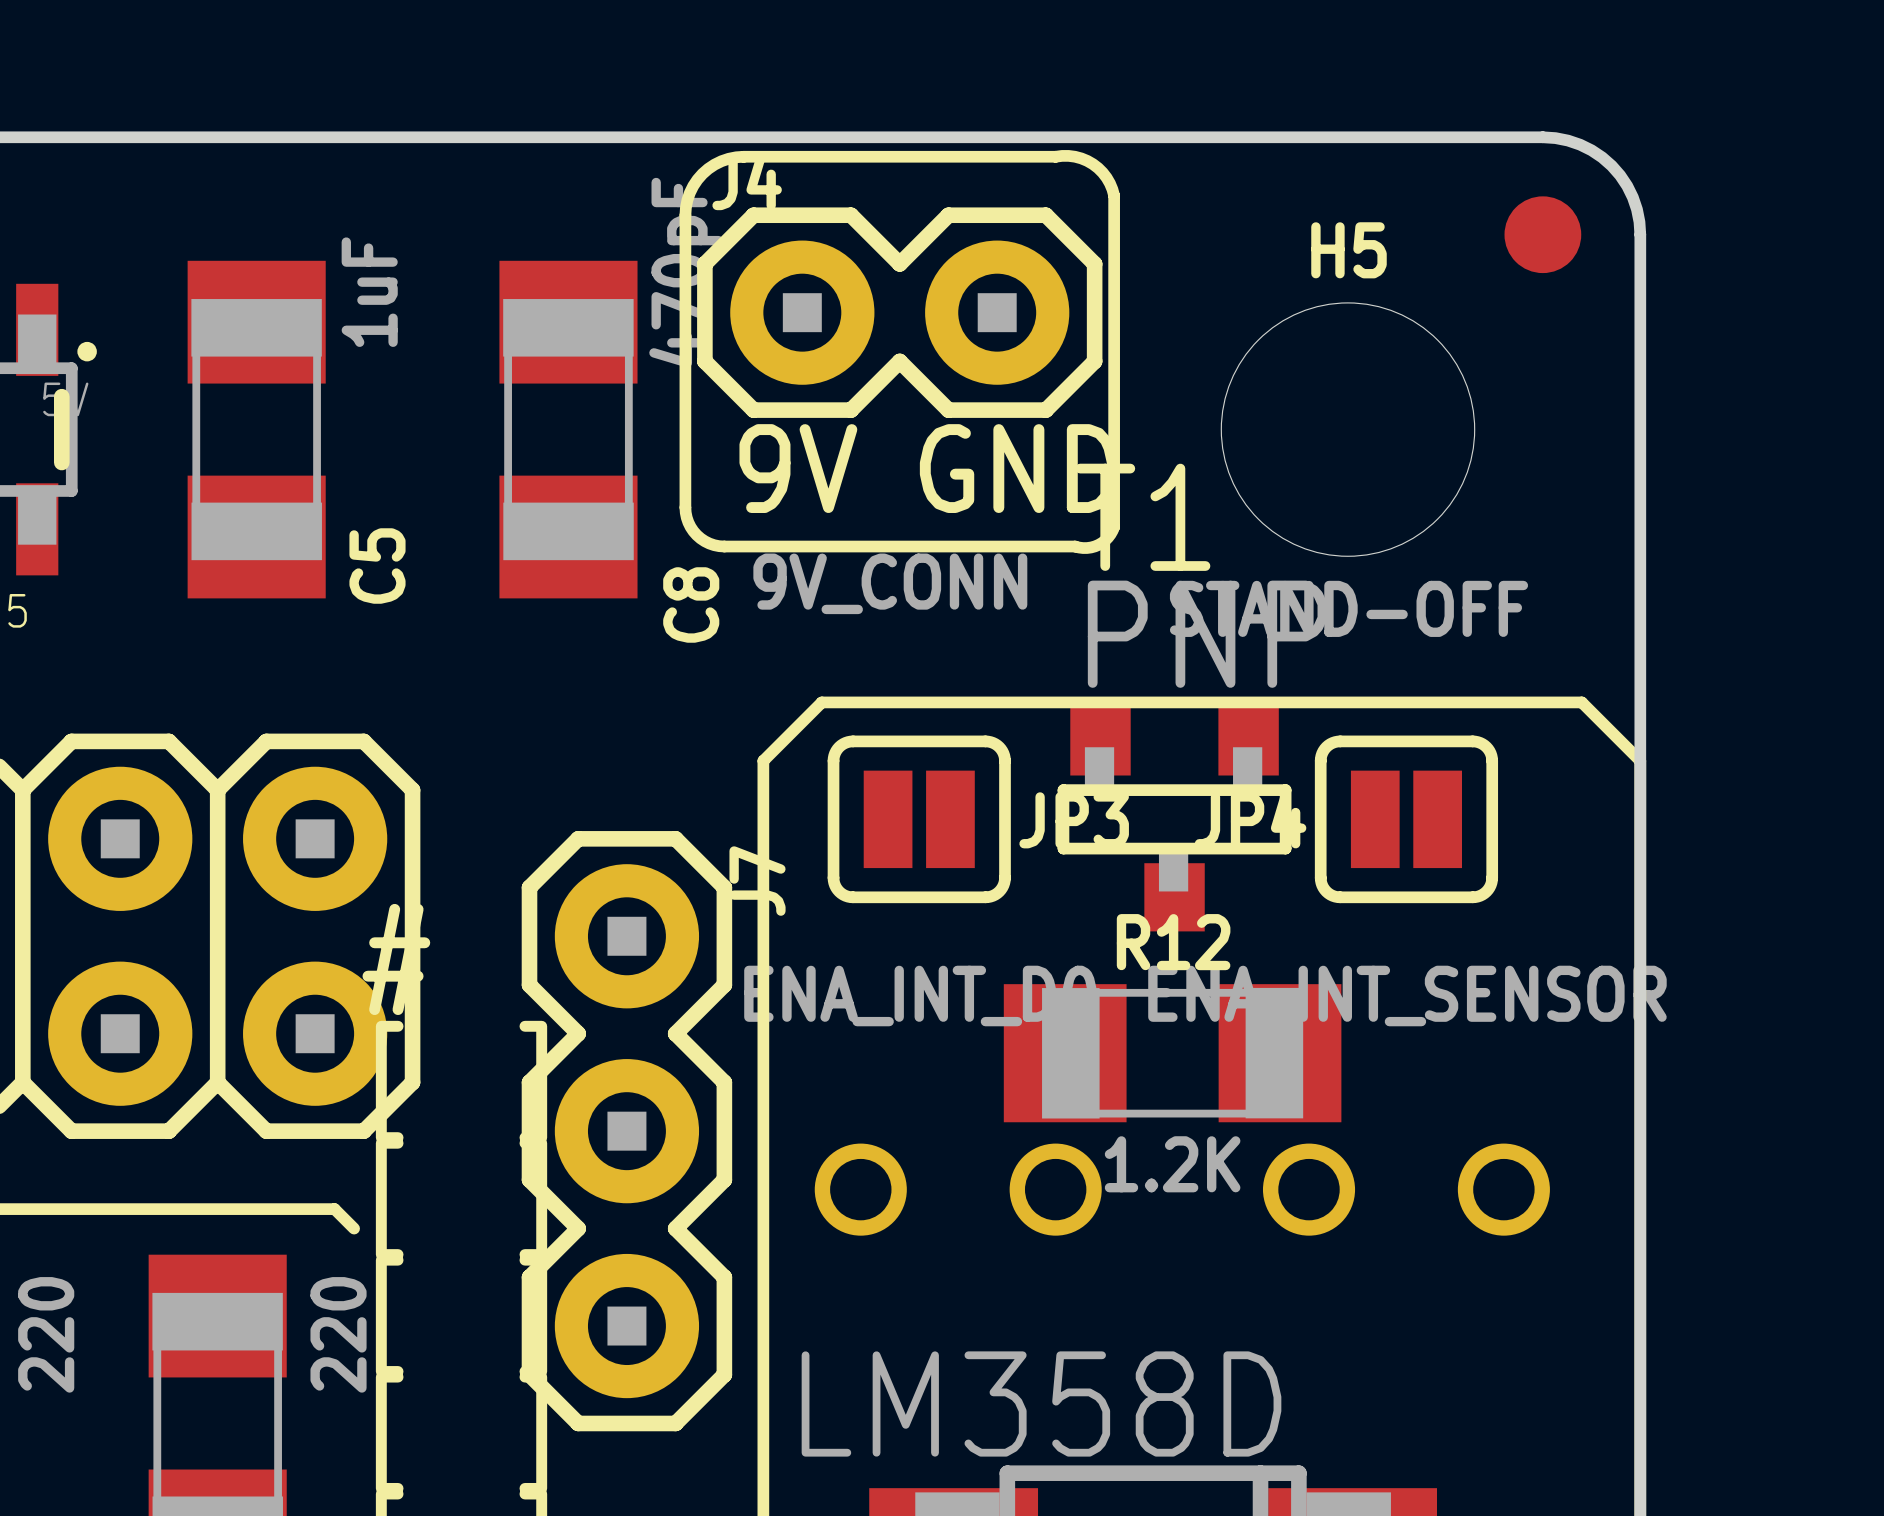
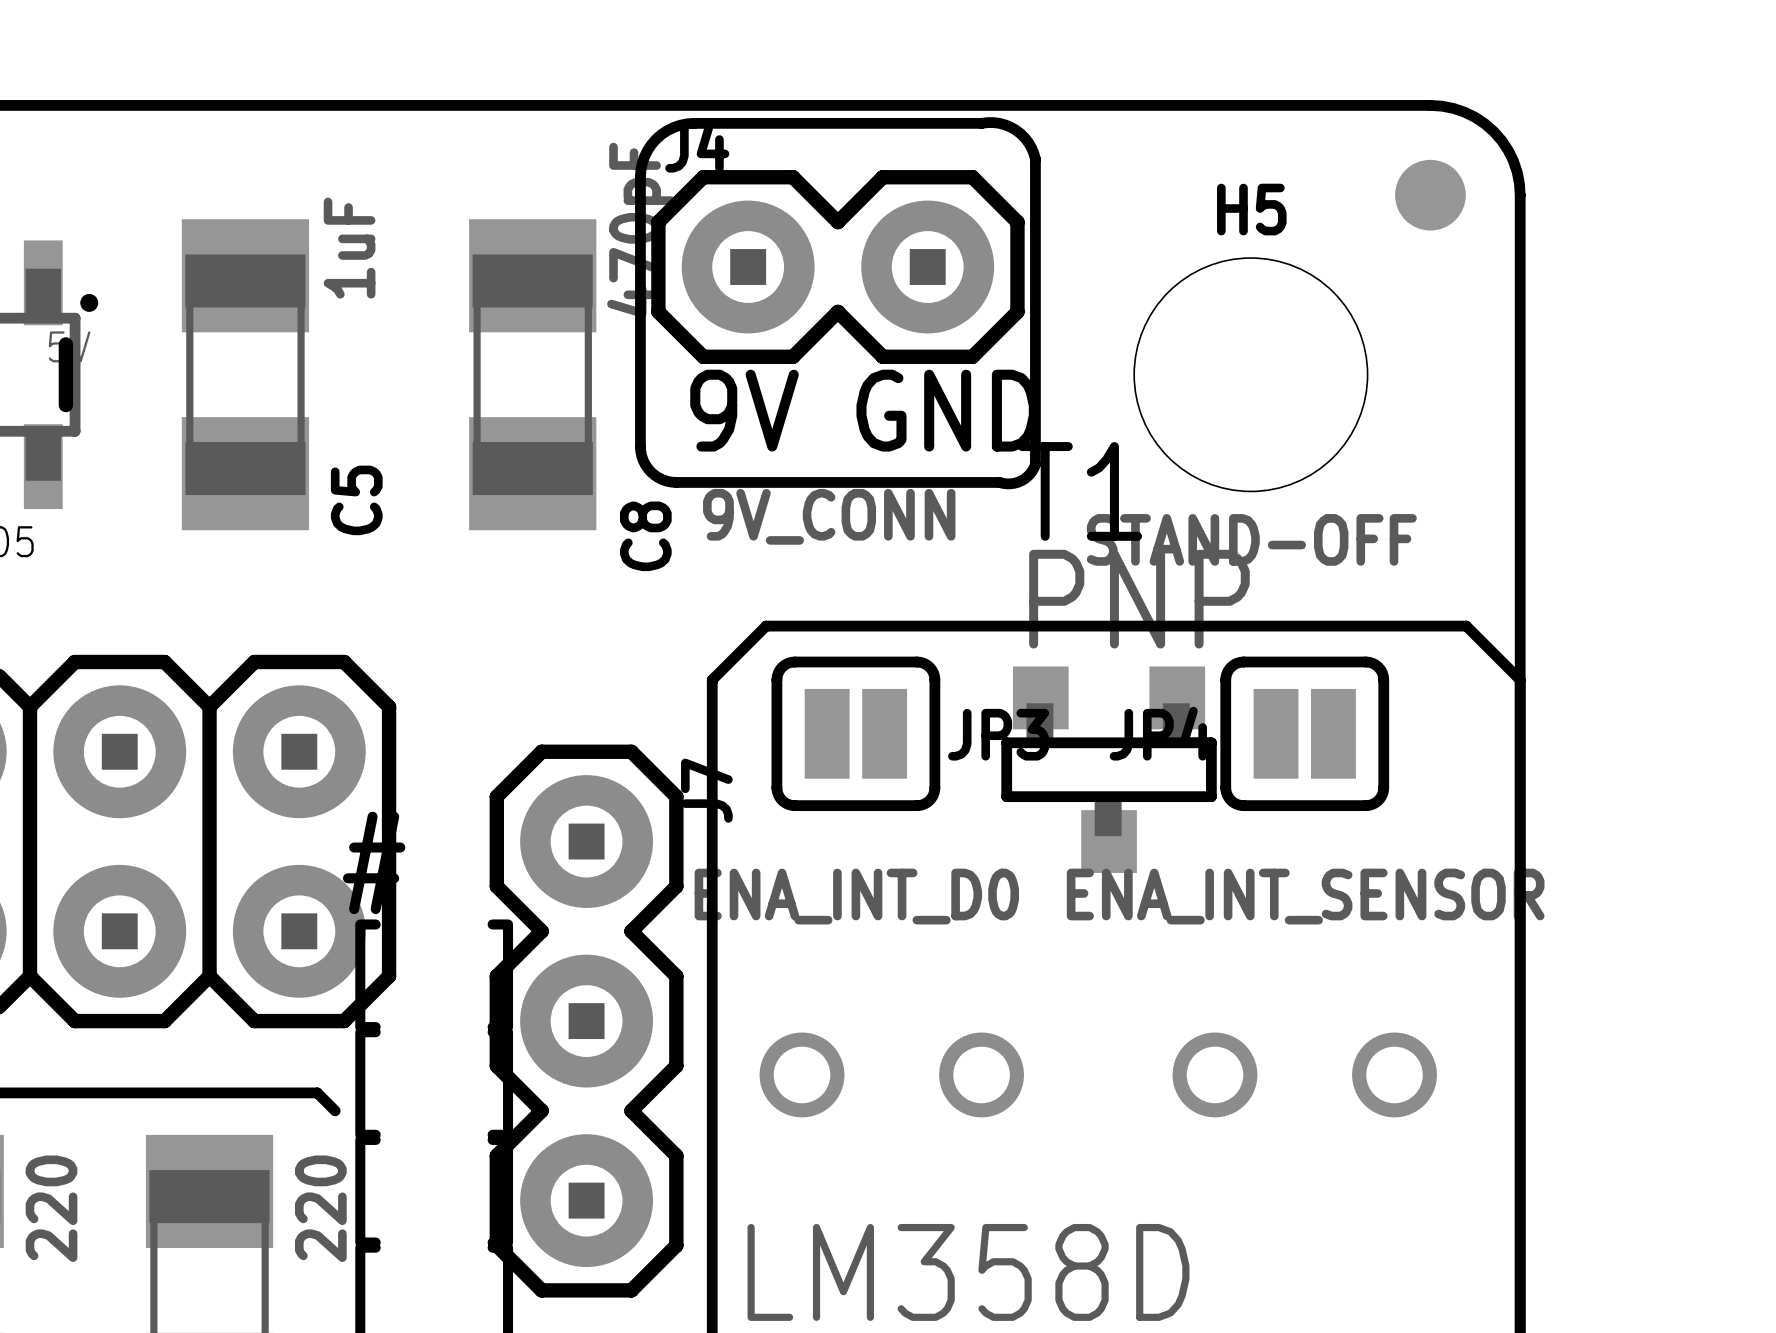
T1 position: (1174, 819) -> (1109, 769)
R12: 1.2K (1172, 1053) -> none

